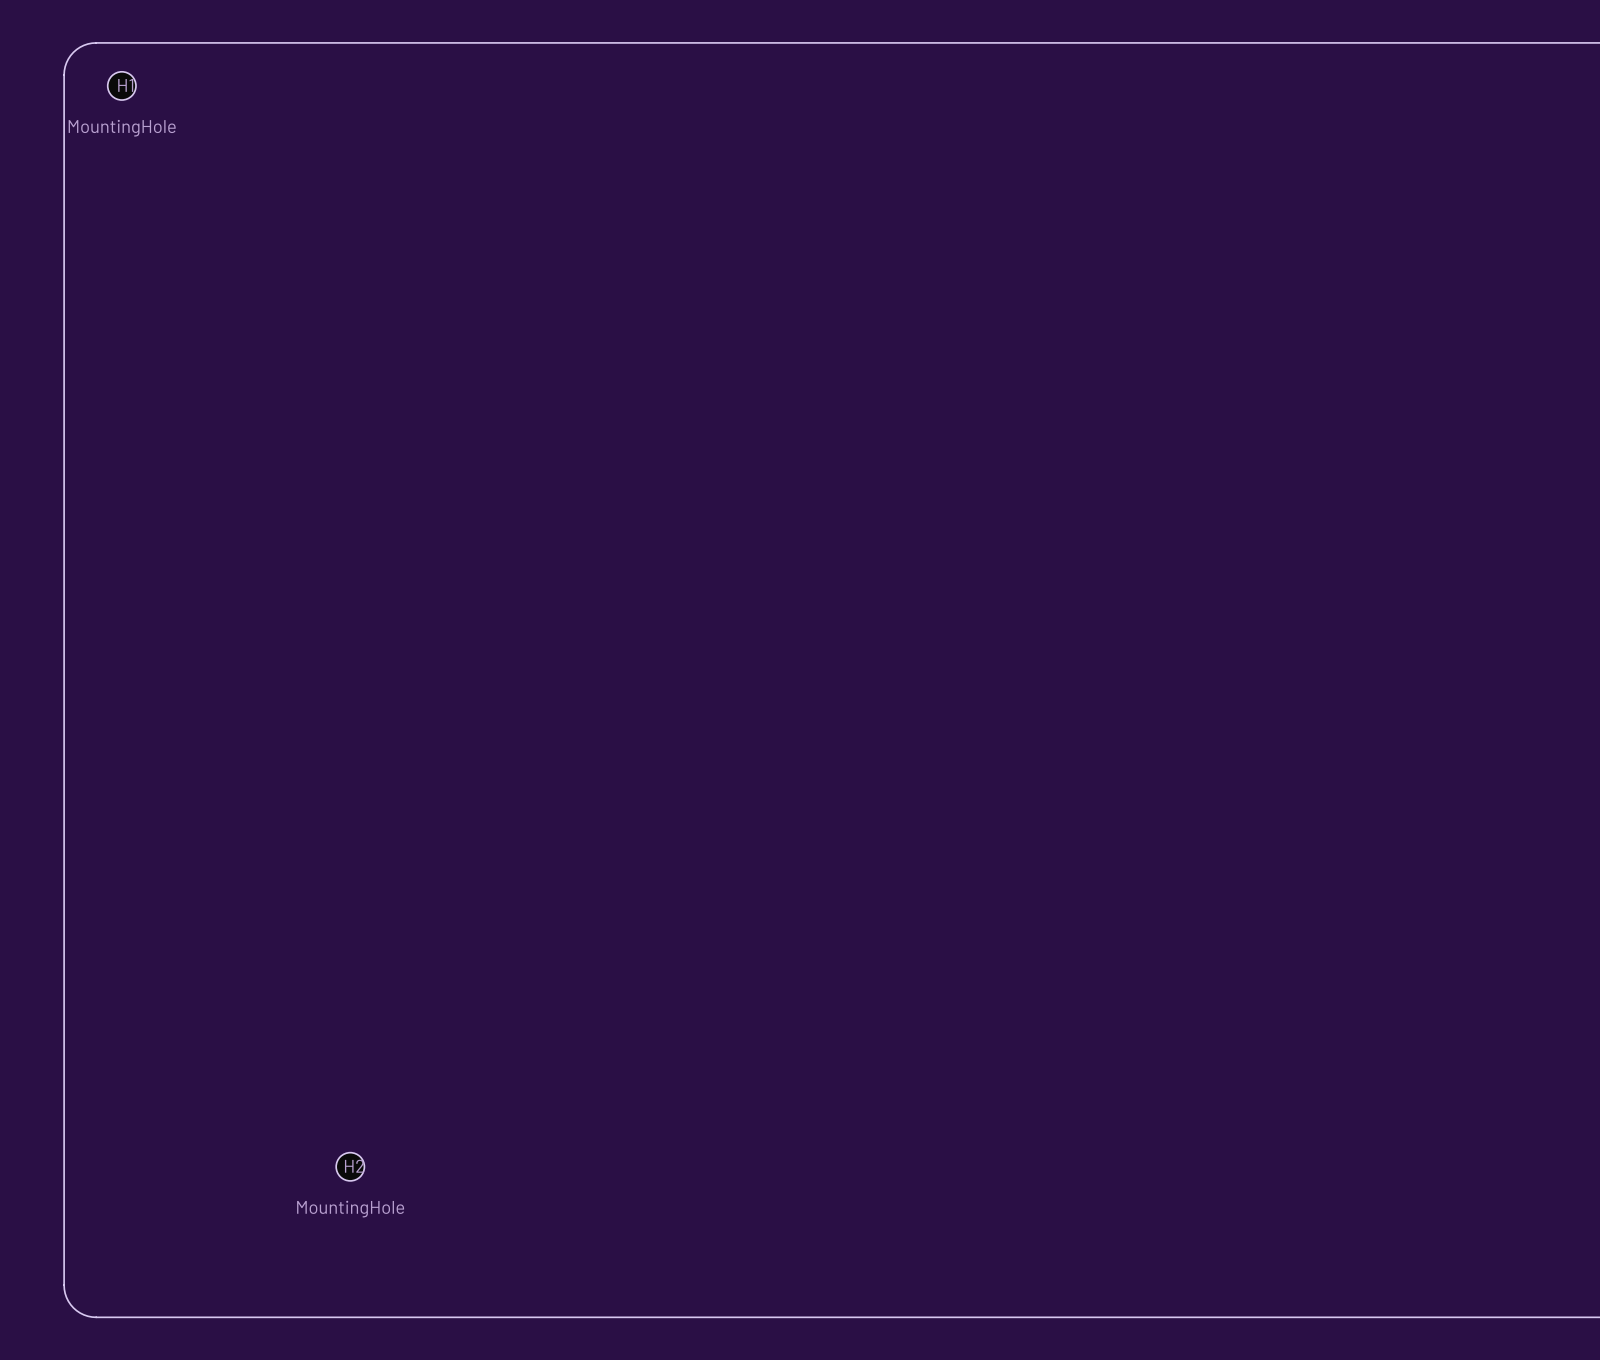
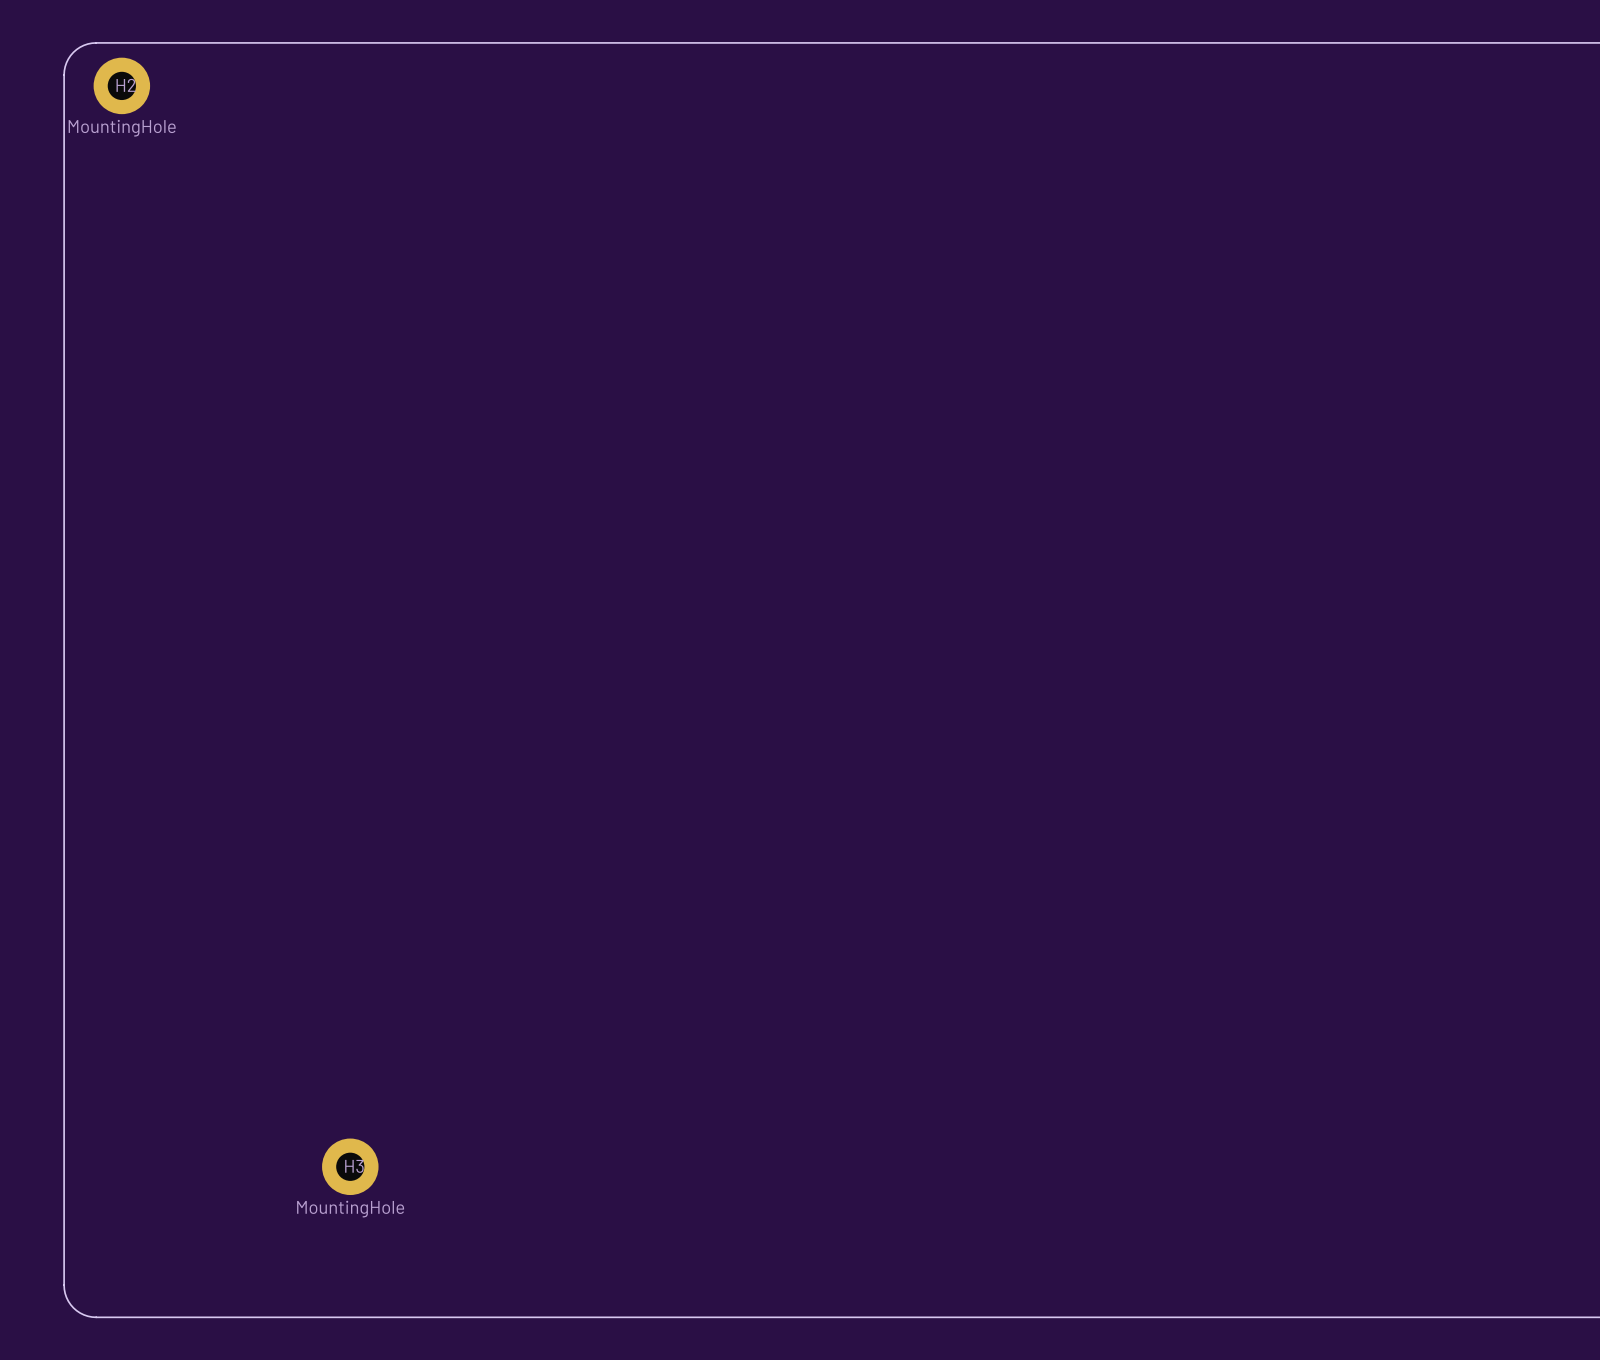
H1: MountingHole (121, 85) -> none
H2 footprint: [336, 1152, 365, 1181] -> [93, 57, 151, 115]
H3: none -> MountingHole (350, 1166)

